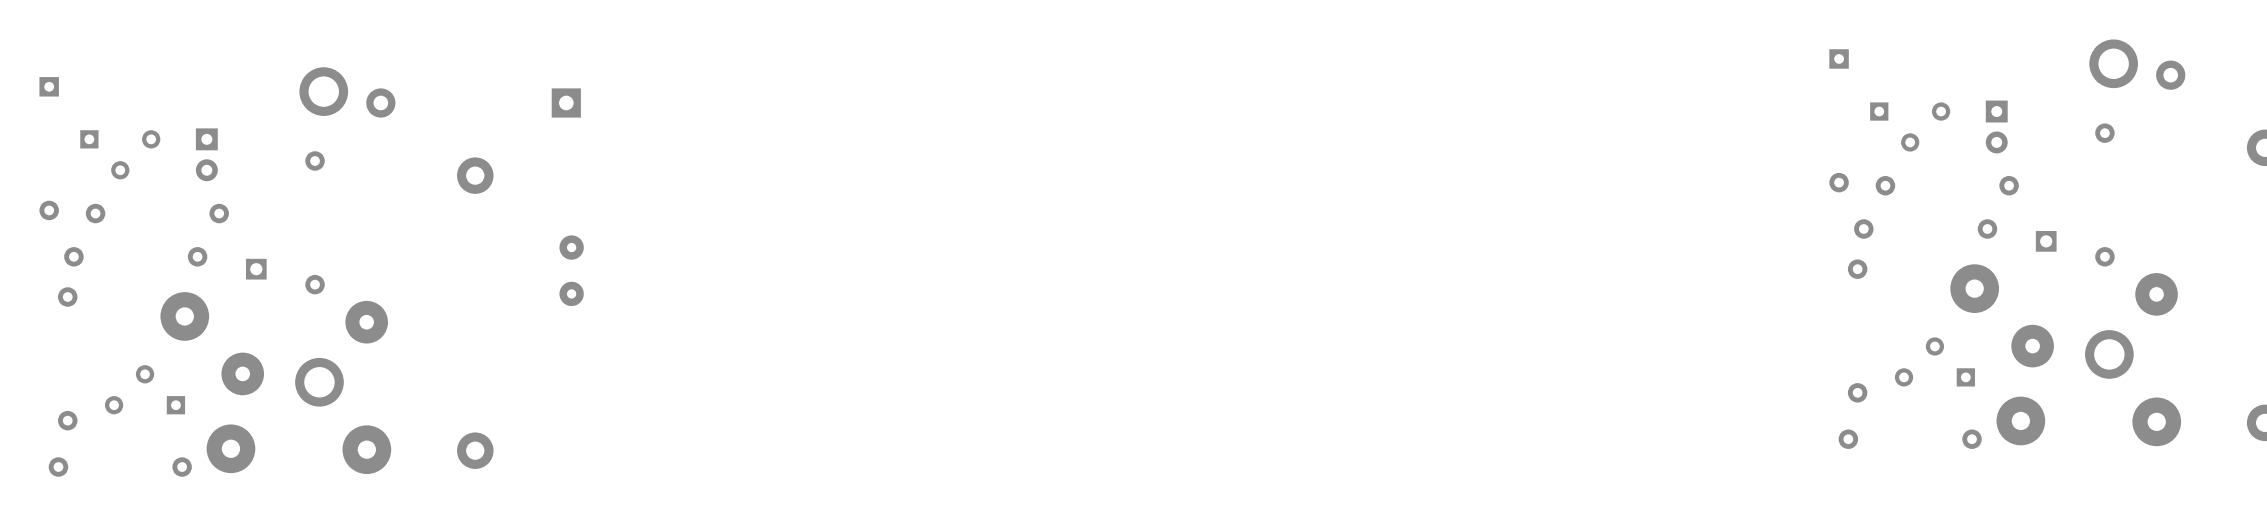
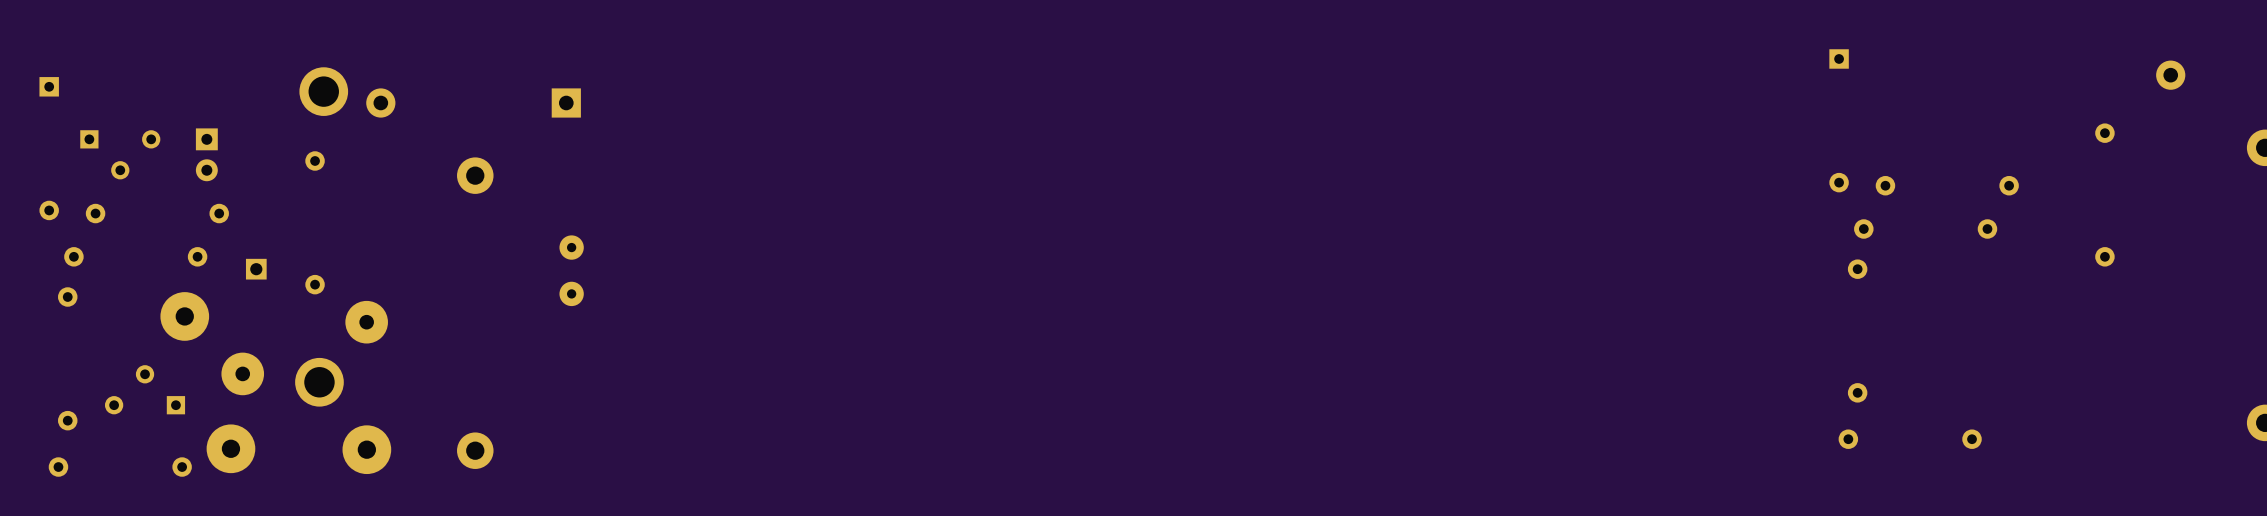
part: (2113, 63) -> none
part: (1910, 126) -> none
part: (1996, 126) -> none
part: (2046, 241) -> none
part: (1974, 288) -> none
part: (2156, 294) -> none
part: (2032, 346) -> none
part: (2109, 354) -> none
part: (1934, 361) -> none
part: (2020, 420) -> none
part: (2156, 421) -> none

